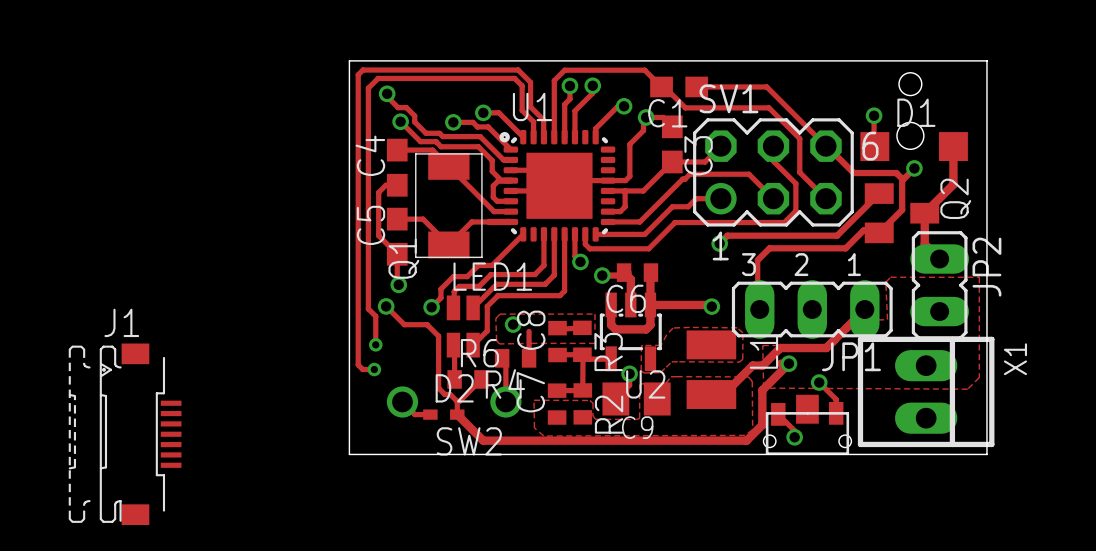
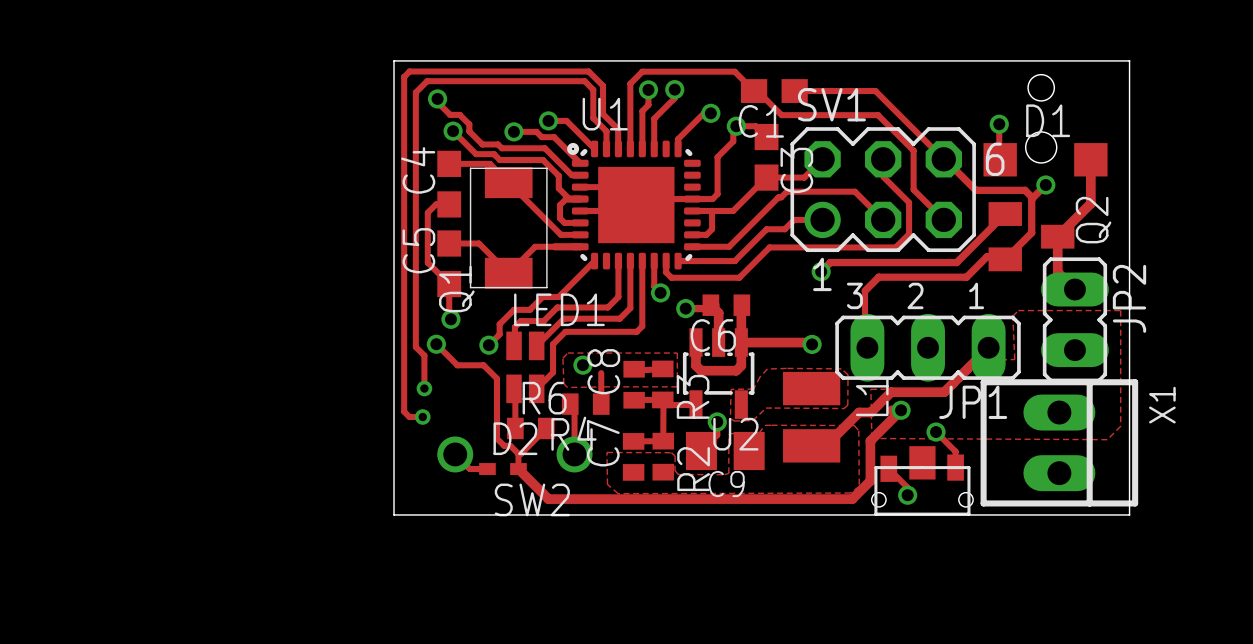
J1: (125, 434) -> none

